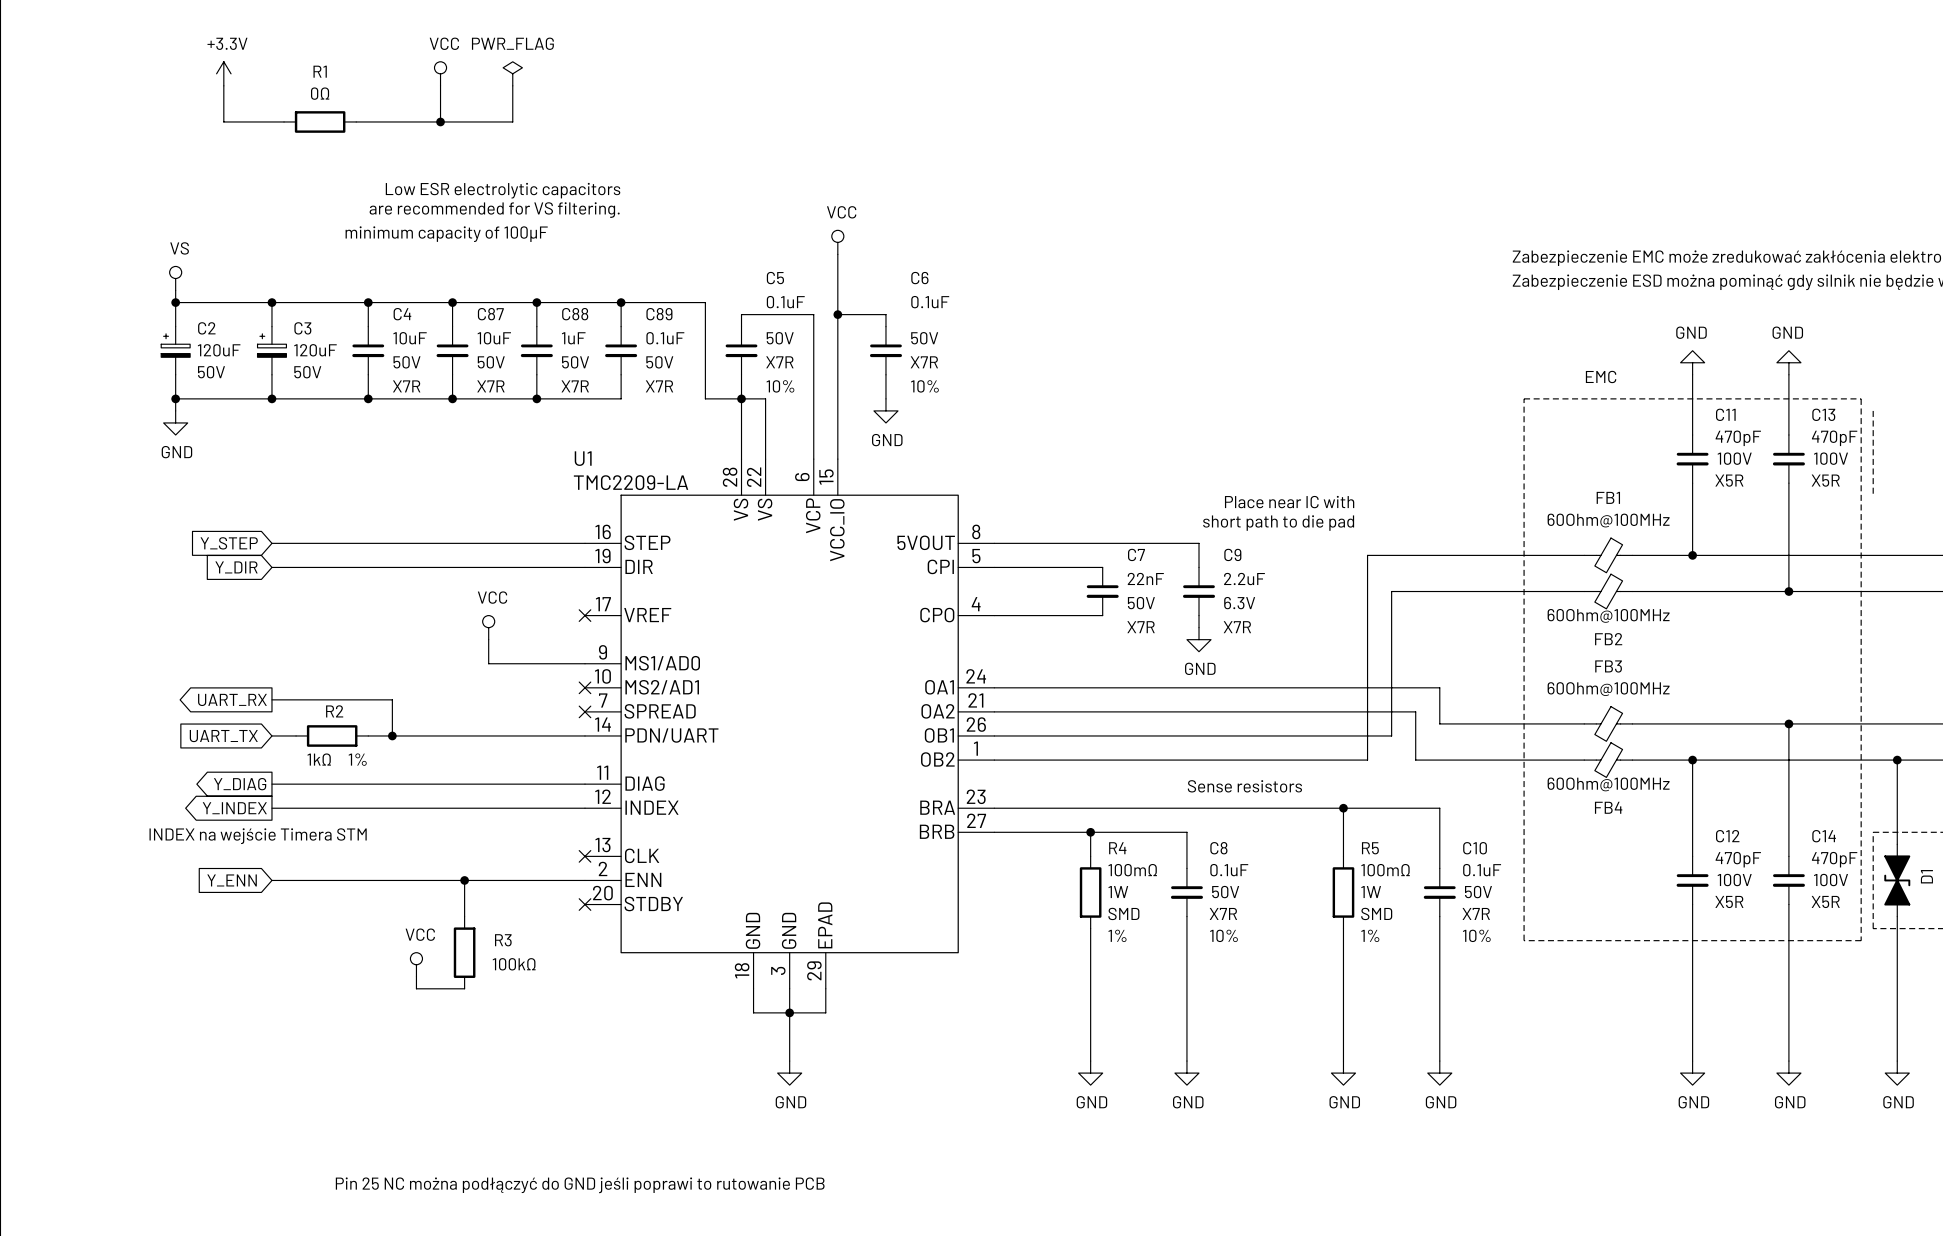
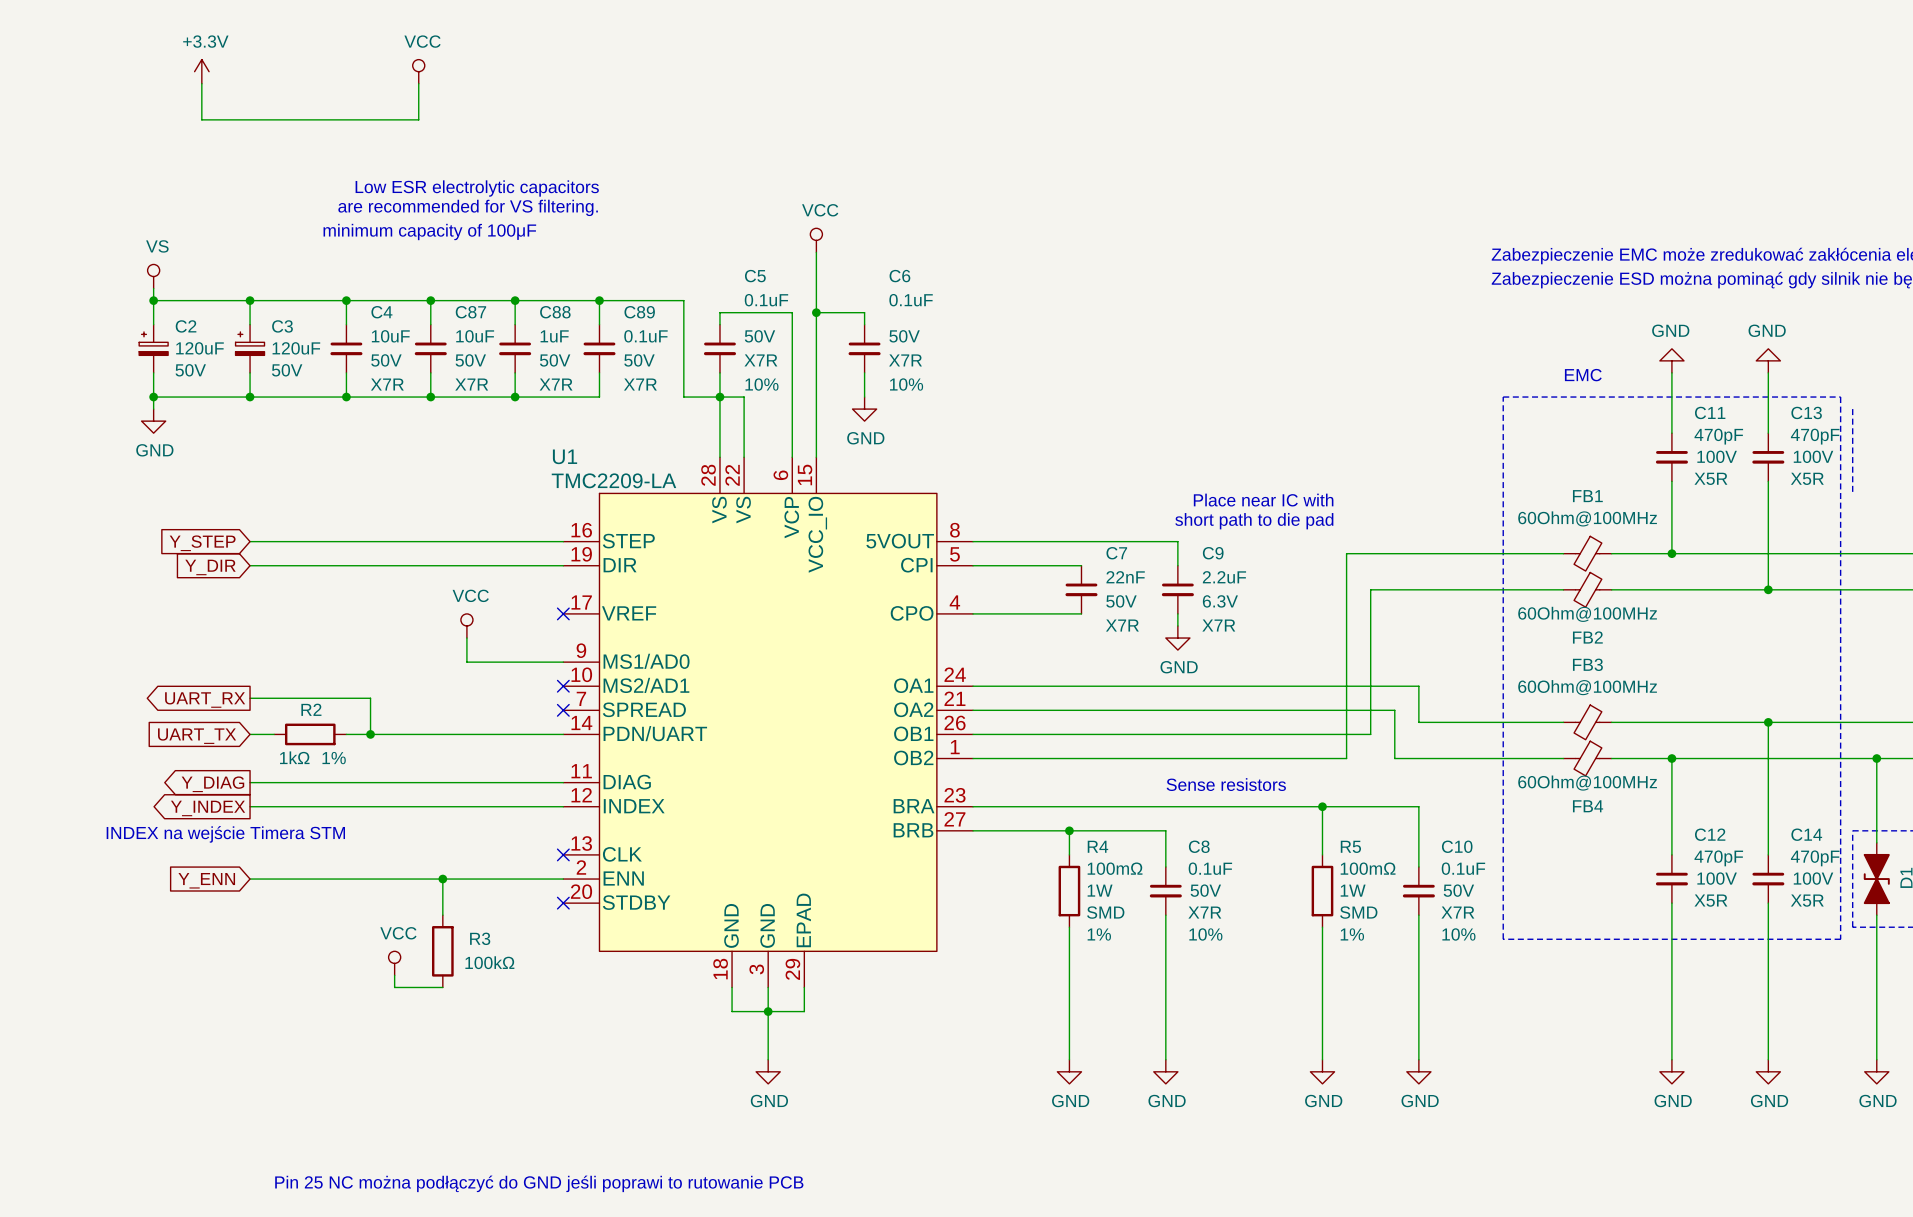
power symbol: PWR_FLAG (512, 73) -> none
wire: (512, 85) (512, 121) (440, 121) -> none
wire: none -> (262, 119) (334, 119)
R1: 0Ω (320, 121) -> none
junction: (440, 121) -> none

